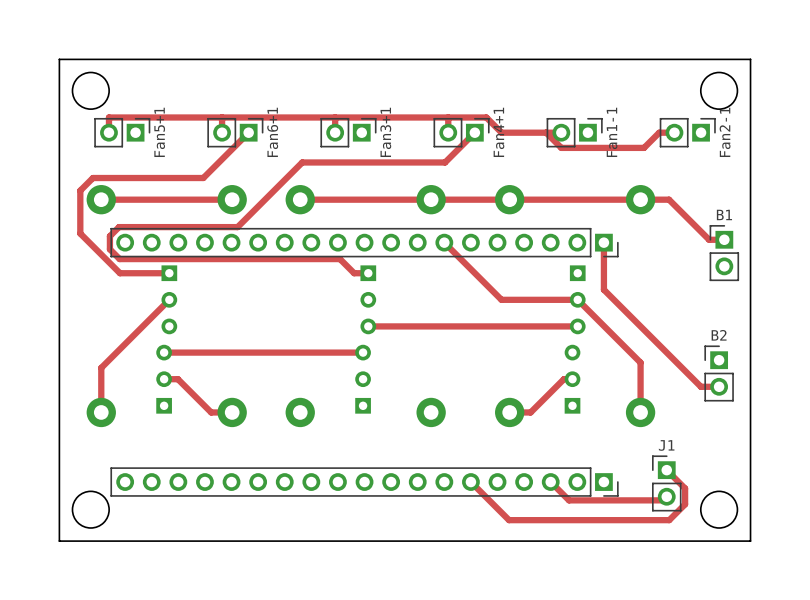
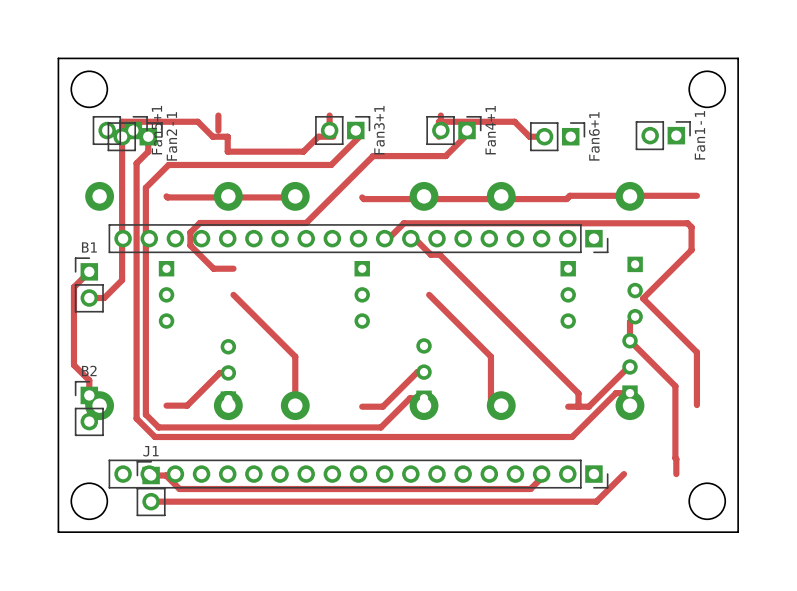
track: (108, 132) (108, 117) (486, 117) (501, 132) (561, 132) -> none
Fan6+1 position: (235, 132) -> (557, 136)
track: (248, 132) (203, 178) (92, 178) (80, 190) (80, 233) (119, 273) (169, 273) -> none
track: (474, 132) (445, 162) (302, 162) (237, 227) (119, 227) (109, 236) (109, 249) (119, 259) (340, 259) (354, 273) (368, 273) -> none
track: (546, 132) (561, 147) (644, 147) (659, 132) (674, 132) -> none
Fan1-1 position: (574, 132) -> (663, 135)
Fan2-1 position: (687, 132) -> (135, 136)
track: none -> (148, 136) (148, 151) (136, 163) (136, 418) (154, 436) (572, 436) (616, 393) (629, 393)
track: none -> (333, 136) (318, 136) (303, 151) (227, 151) (227, 136) (212, 136) (197, 121) (122, 121) (122, 280) (104, 298) (89, 298)
track: none -> (359, 136) (331, 164) (168, 164) (145, 187) (145, 414) (158, 427) (380, 427) (410, 398) (424, 398)
track: none -> (438, 136) (438, 121) (514, 121) (529, 136) (544, 136)
track: none -> (465, 136) (445, 156) (373, 156) (306, 223) (199, 223) (190, 232) (190, 245) (213, 268) (233, 268)
track: (101, 199) (232, 199) -> none
track: none -> (166, 196) (295, 197)
track: (300, 199) (669, 199) (709, 239) (724, 239) -> none
track: none -> (696, 195) (569, 195) (566, 199) (363, 199) (362, 197)
track: none -> (388, 238) (403, 223) (687, 223) (691, 227) (691, 250) (643, 298) (696, 352) (696, 405)
track: none -> (414, 238) (430, 254) (439, 254) (578, 393) (578, 406)
track: (444, 242) (501, 299) (577, 299) (640, 362) (640, 412) -> none
track: (603, 242) (603, 289) (700, 386) (719, 386) -> none
B1 position: (724, 253) -> (89, 284)
track: none -> (89, 271) (73, 287) (73, 365) (89, 380) (89, 395)
part: none -> (635, 290)
track: (169, 299) (101, 367) (101, 412) -> none
track: none -> (233, 294) (295, 356) (295, 406)
track: none -> (429, 294) (490, 356) (490, 408)
track: none -> (635, 316) (629, 321) (629, 340) (675, 386) (676, 474)
track: (368, 326) (577, 326) -> none
track: (164, 352) (363, 352) -> none
track: none -> (629, 366) (588, 406) (568, 406)
part: none -> (629, 366)
B2 position: (719, 373) -> (89, 408)
track: none -> (424, 372) (417, 372) (382, 406) (362, 406)
part: none -> (424, 372)
track: (164, 379) (177, 379) (211, 412) (232, 412) -> none
part: (164, 379) -> none
track: none -> (228, 372) (219, 372) (187, 405) (166, 405)
part: none -> (228, 372)
part: (363, 379) -> none
track: (572, 379) (563, 379) (530, 412) (509, 412) -> none
part: (572, 379) -> none
track: (666, 470) (685, 488) (685, 504) (669, 520) (509, 520) (470, 482) -> none
track: (550, 482) (569, 500) (663, 500) (666, 496) -> none
track: none -> (545, 474) (530, 489) (179, 489) (166, 475) (151, 475)
track: none -> (624, 474) (596, 501) (151, 501)
J1 position: (666, 483) -> (151, 488)

